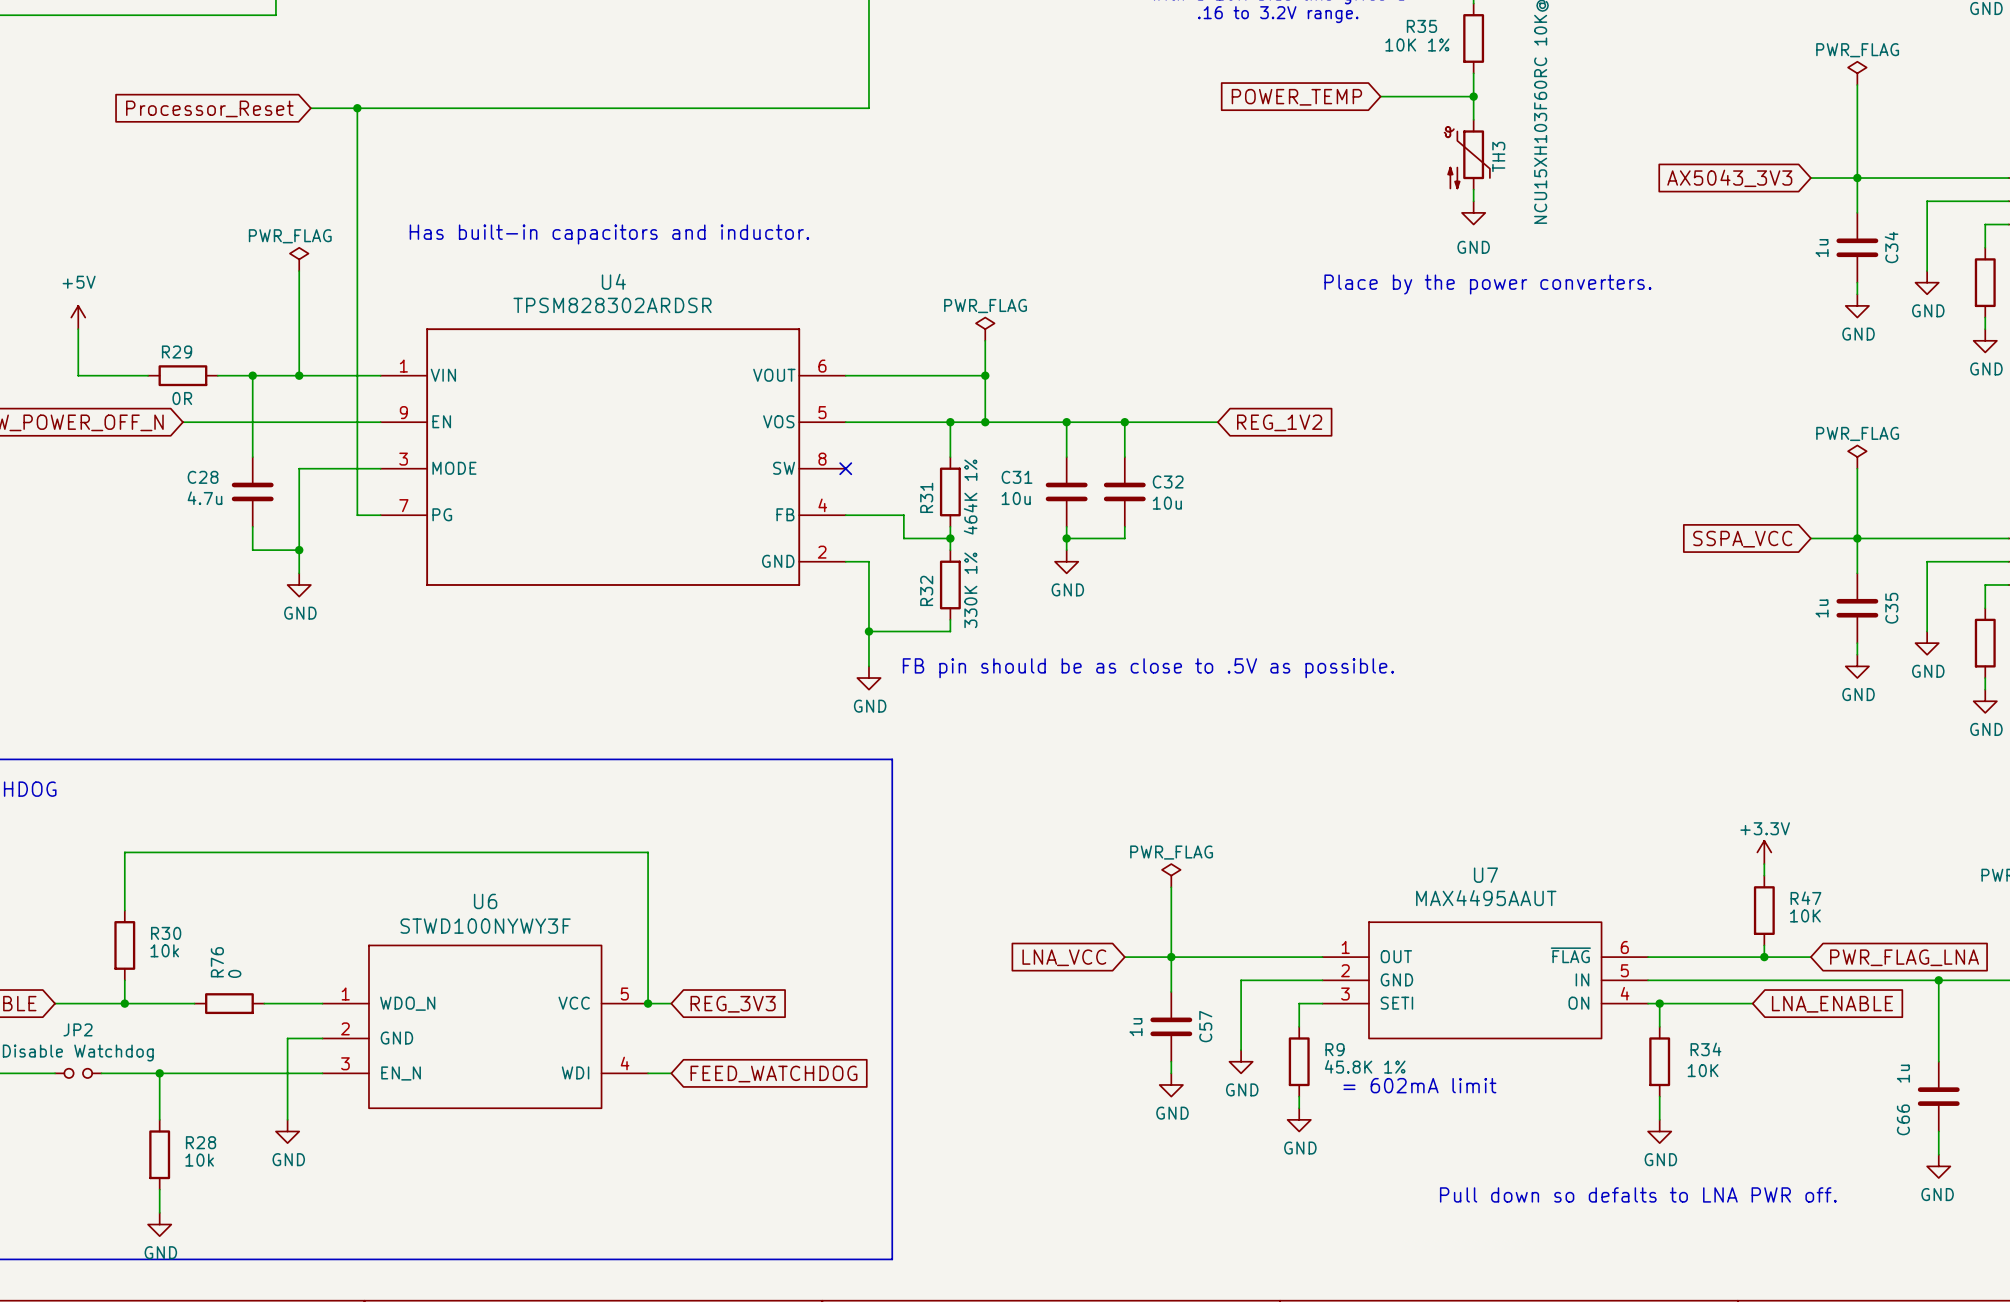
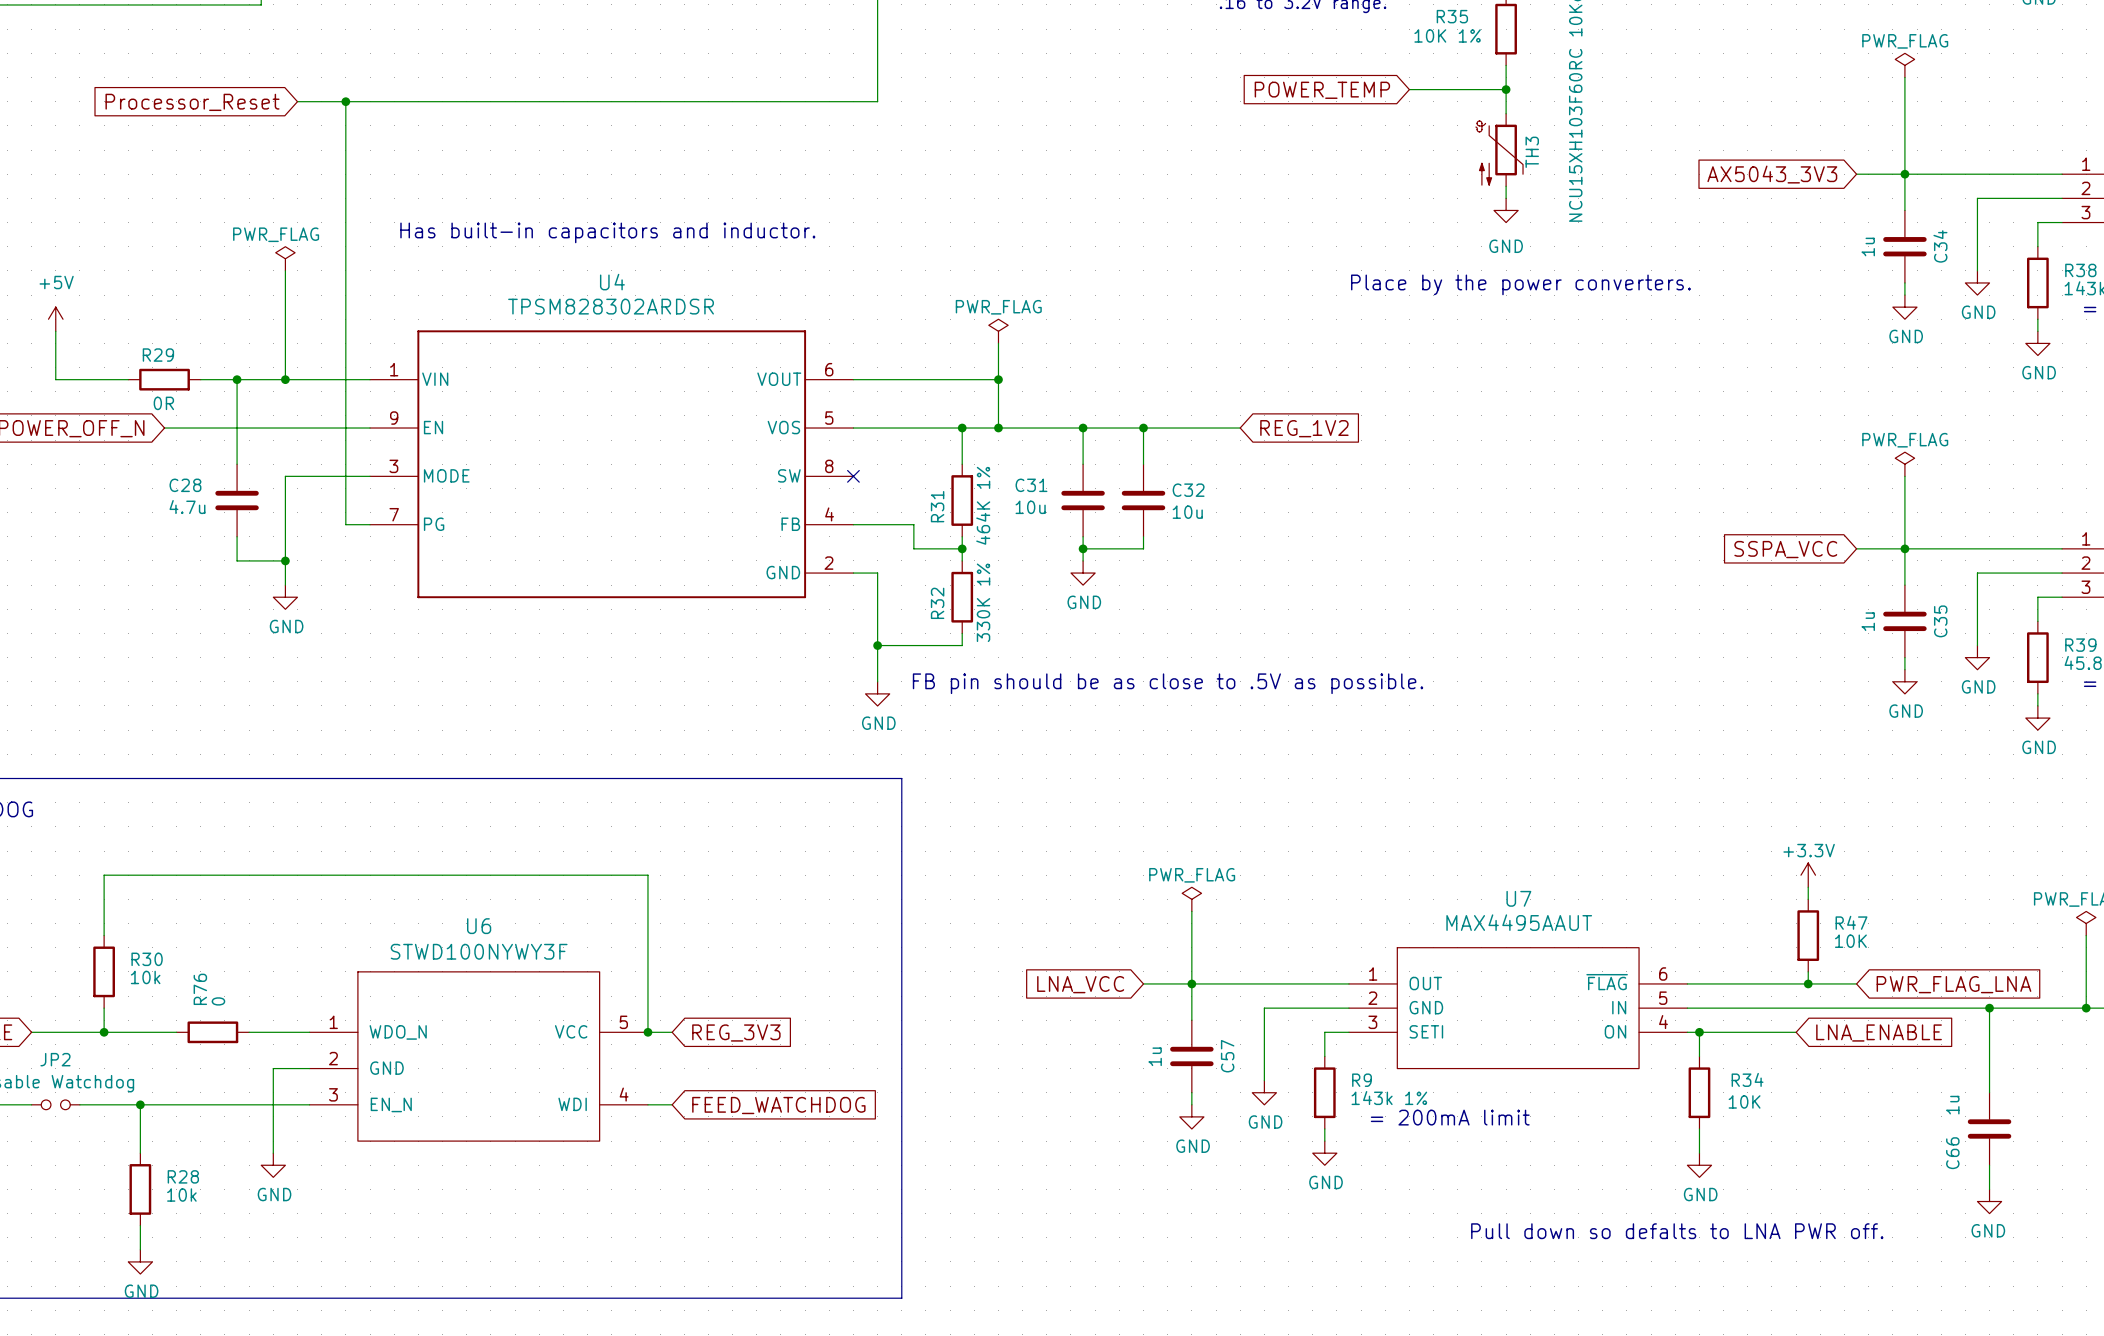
R9 value: 45.8K 1% (1365, 1066) -> 143k 1% (1389, 1098)
text: = 602mA limit (1419, 1085) -> = 200mA limit (1450, 1117)

